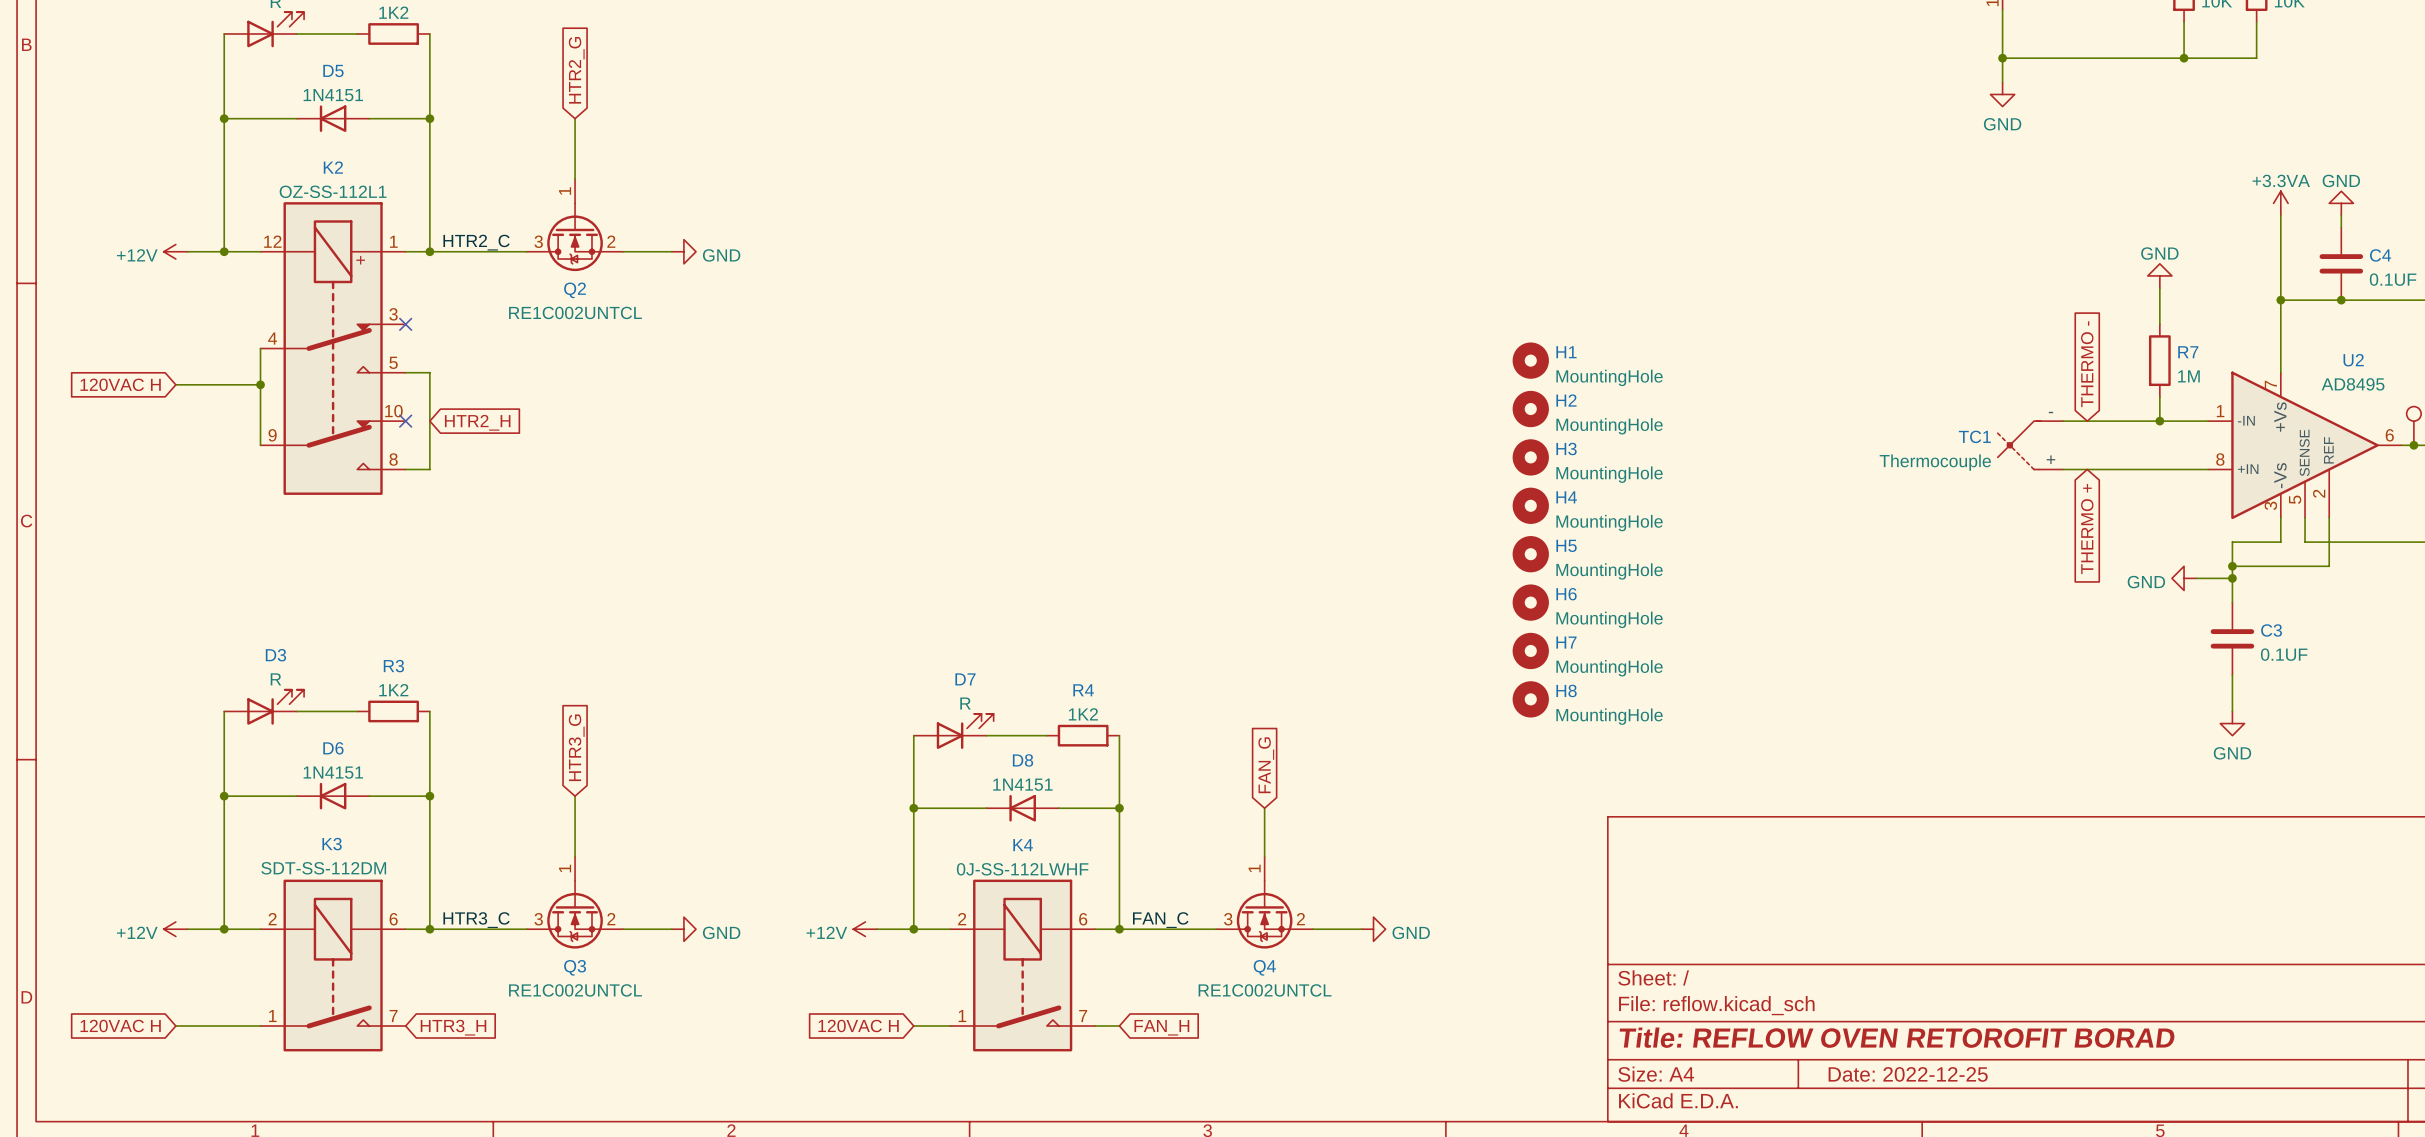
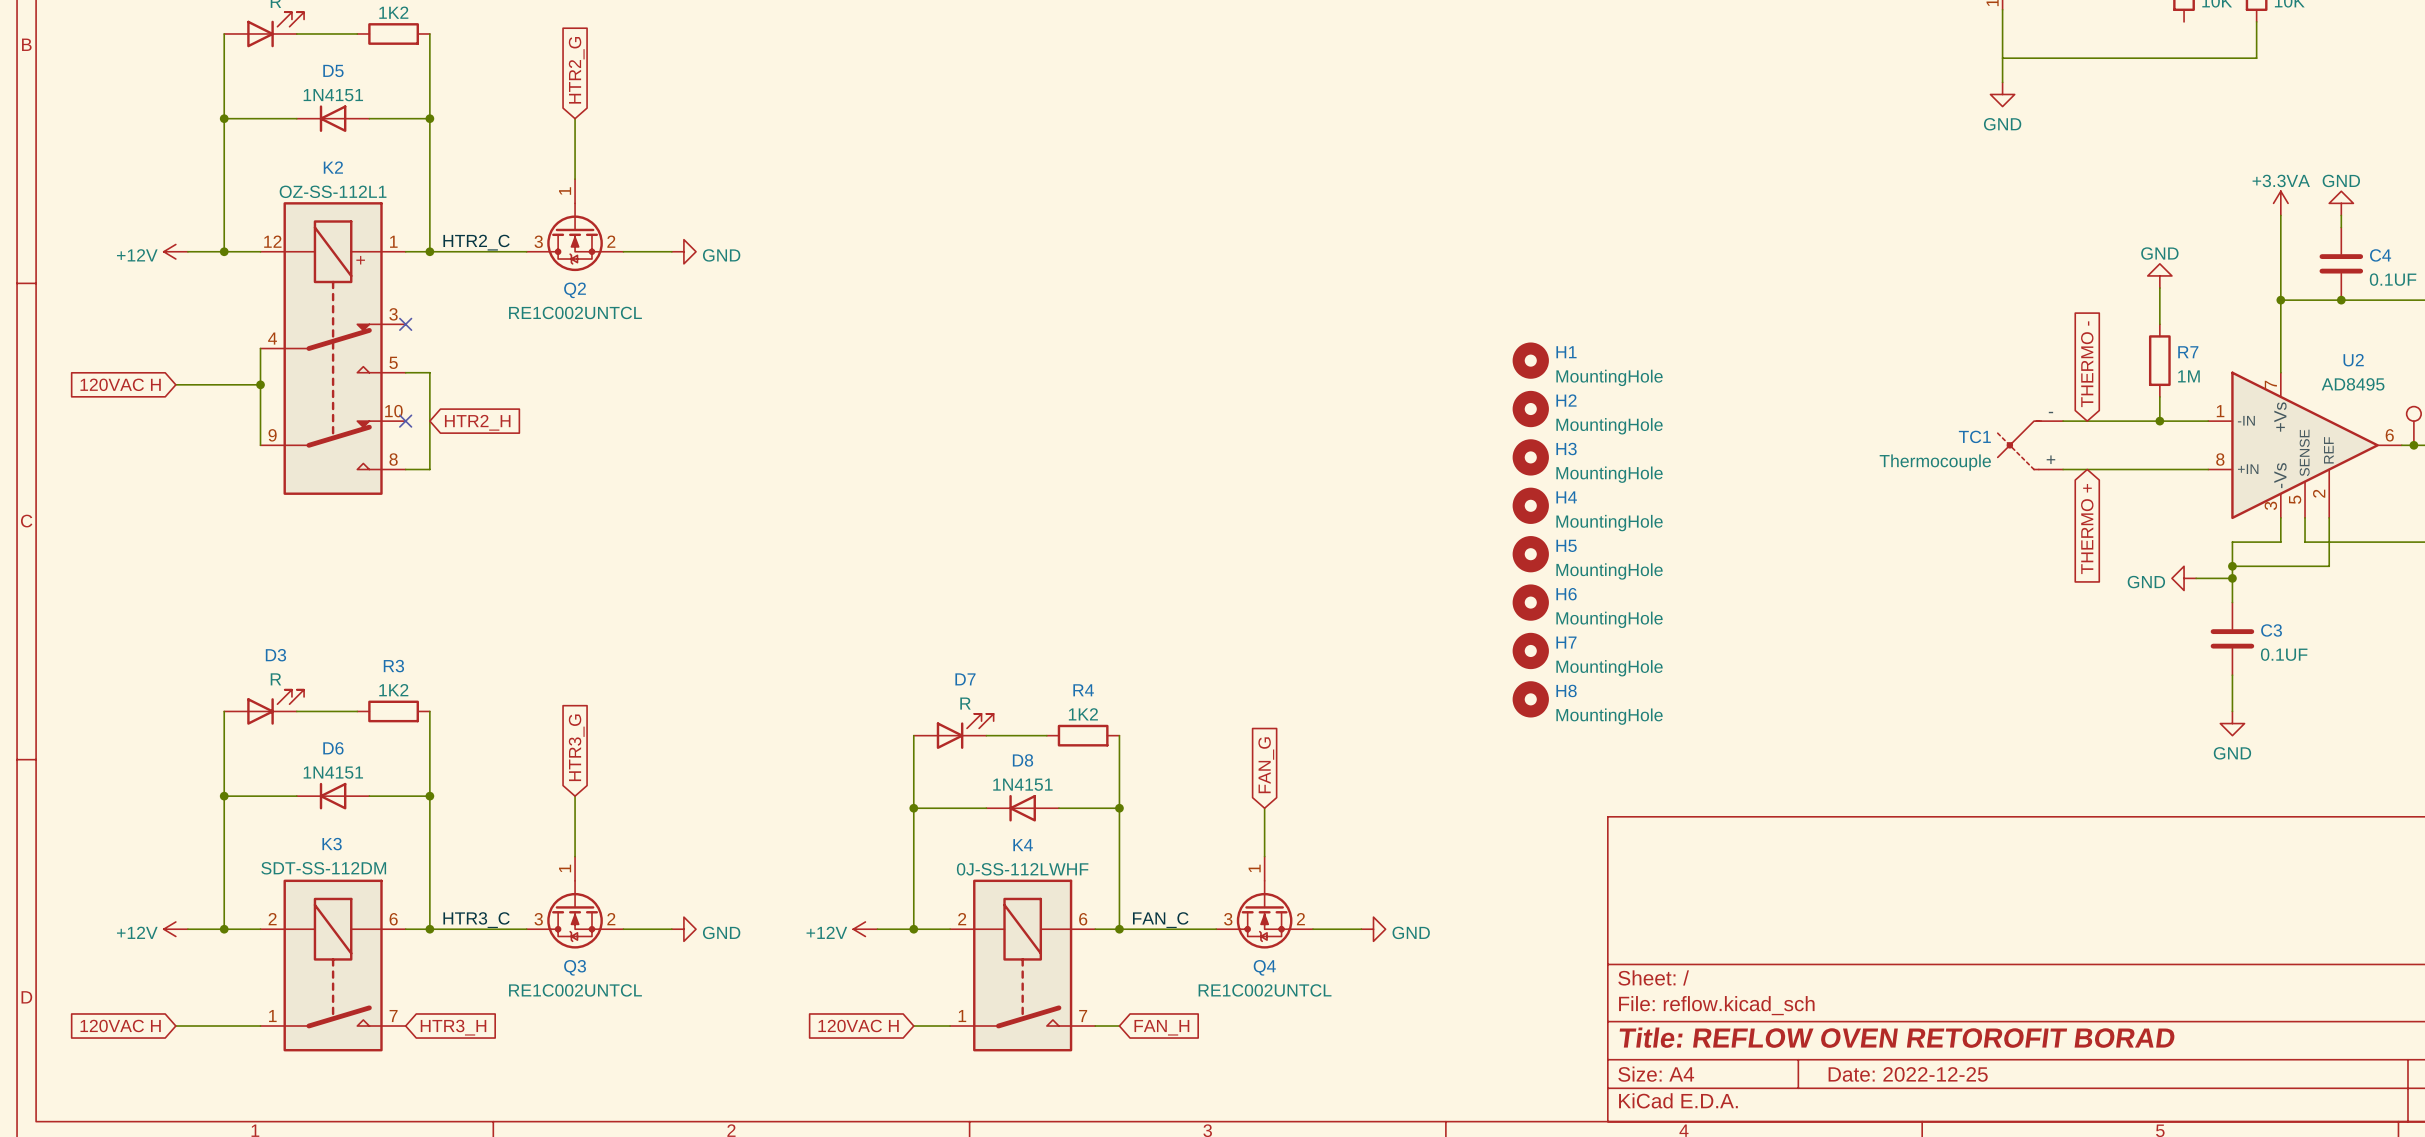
wire: (2184, 21) (2184, 58) -> none
junction: (2002, 58) -> none
junction: (2184, 58) -> none

